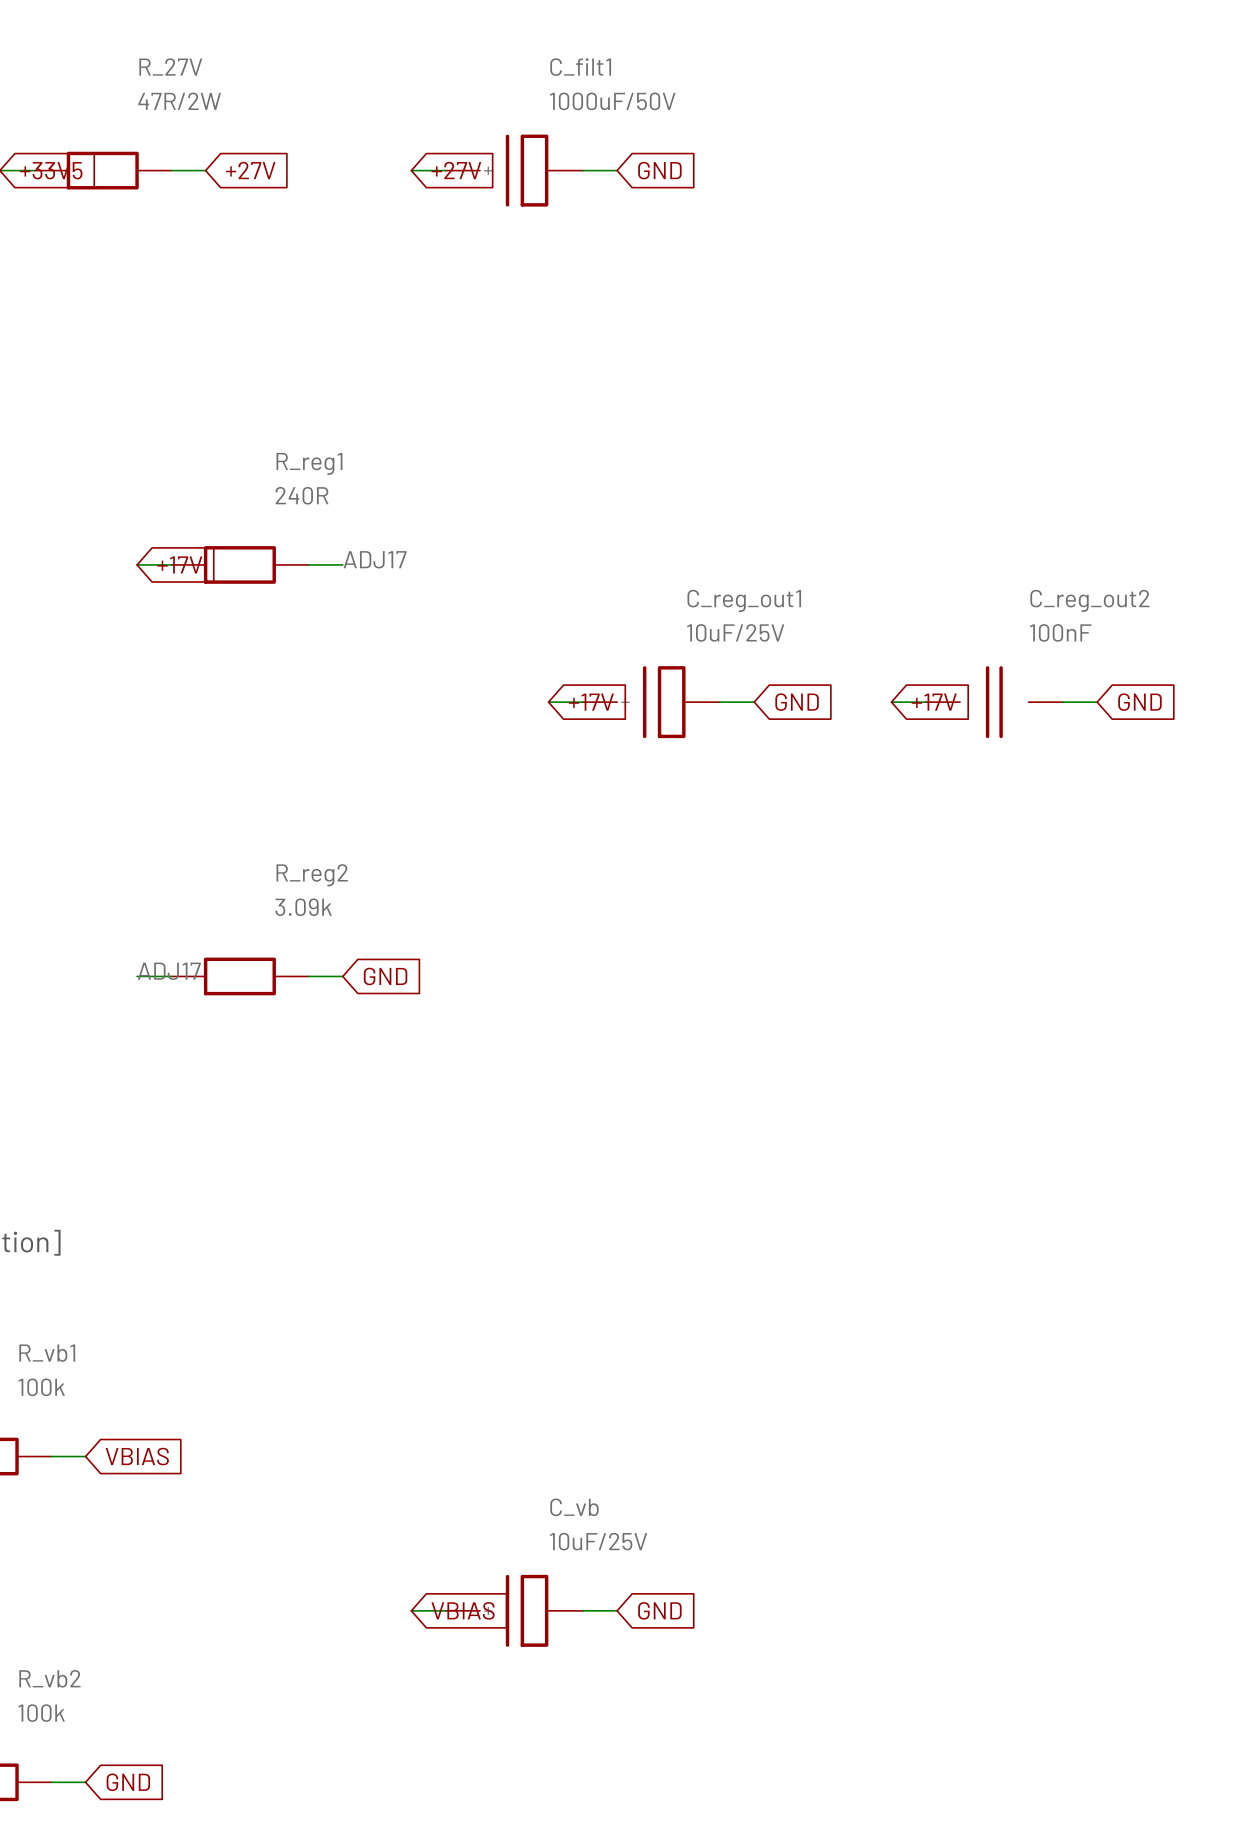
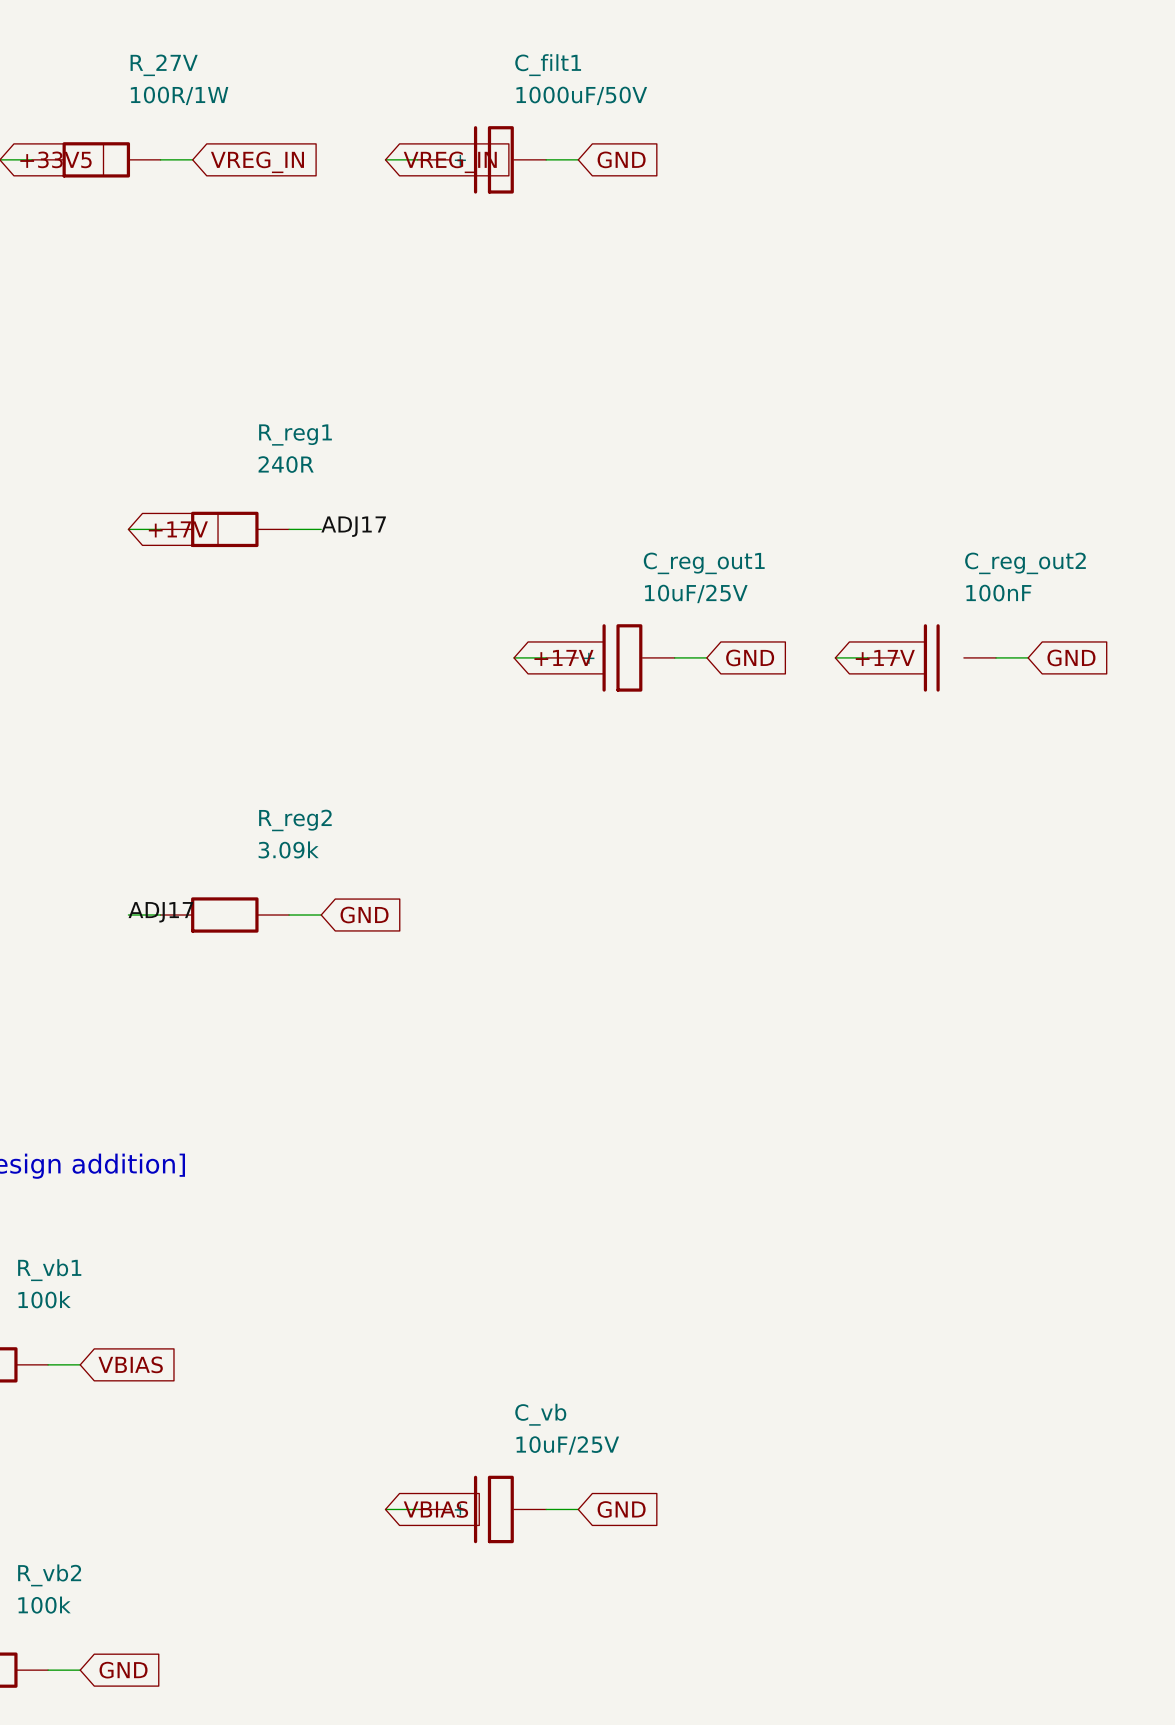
R_27V value: 47R/2W (179, 101) -> 100R/1W (179, 95)
global label: +27V (250, 170) -> VREG_IN (257, 162)
global label: +27V (456, 170) -> VREG_IN (450, 162)

